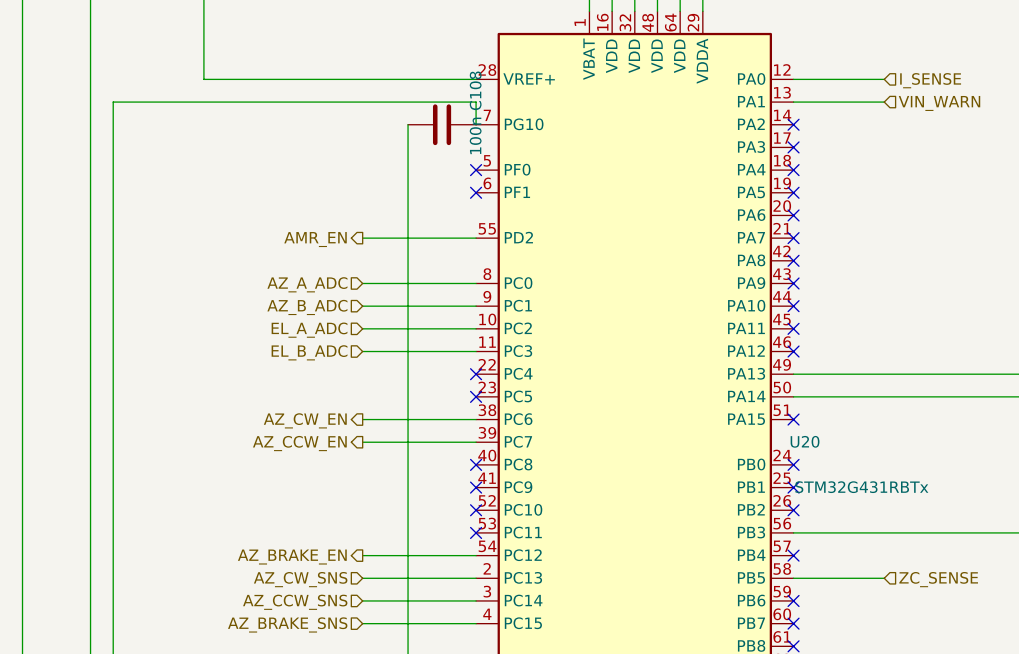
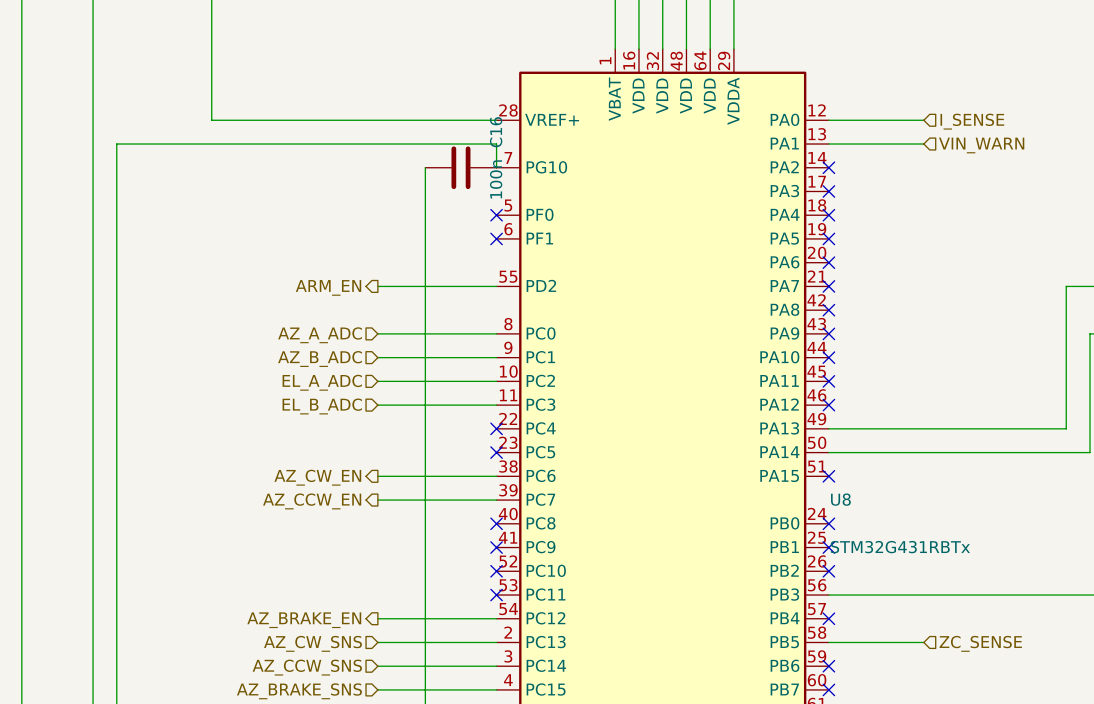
C108 name: C108 (475, 90) -> C16 (496, 132)
hierarchical label: AMR_EN (315, 239) -> ARM_EN (328, 287)
U20 name: U20 (805, 441) -> U8 (840, 499)

